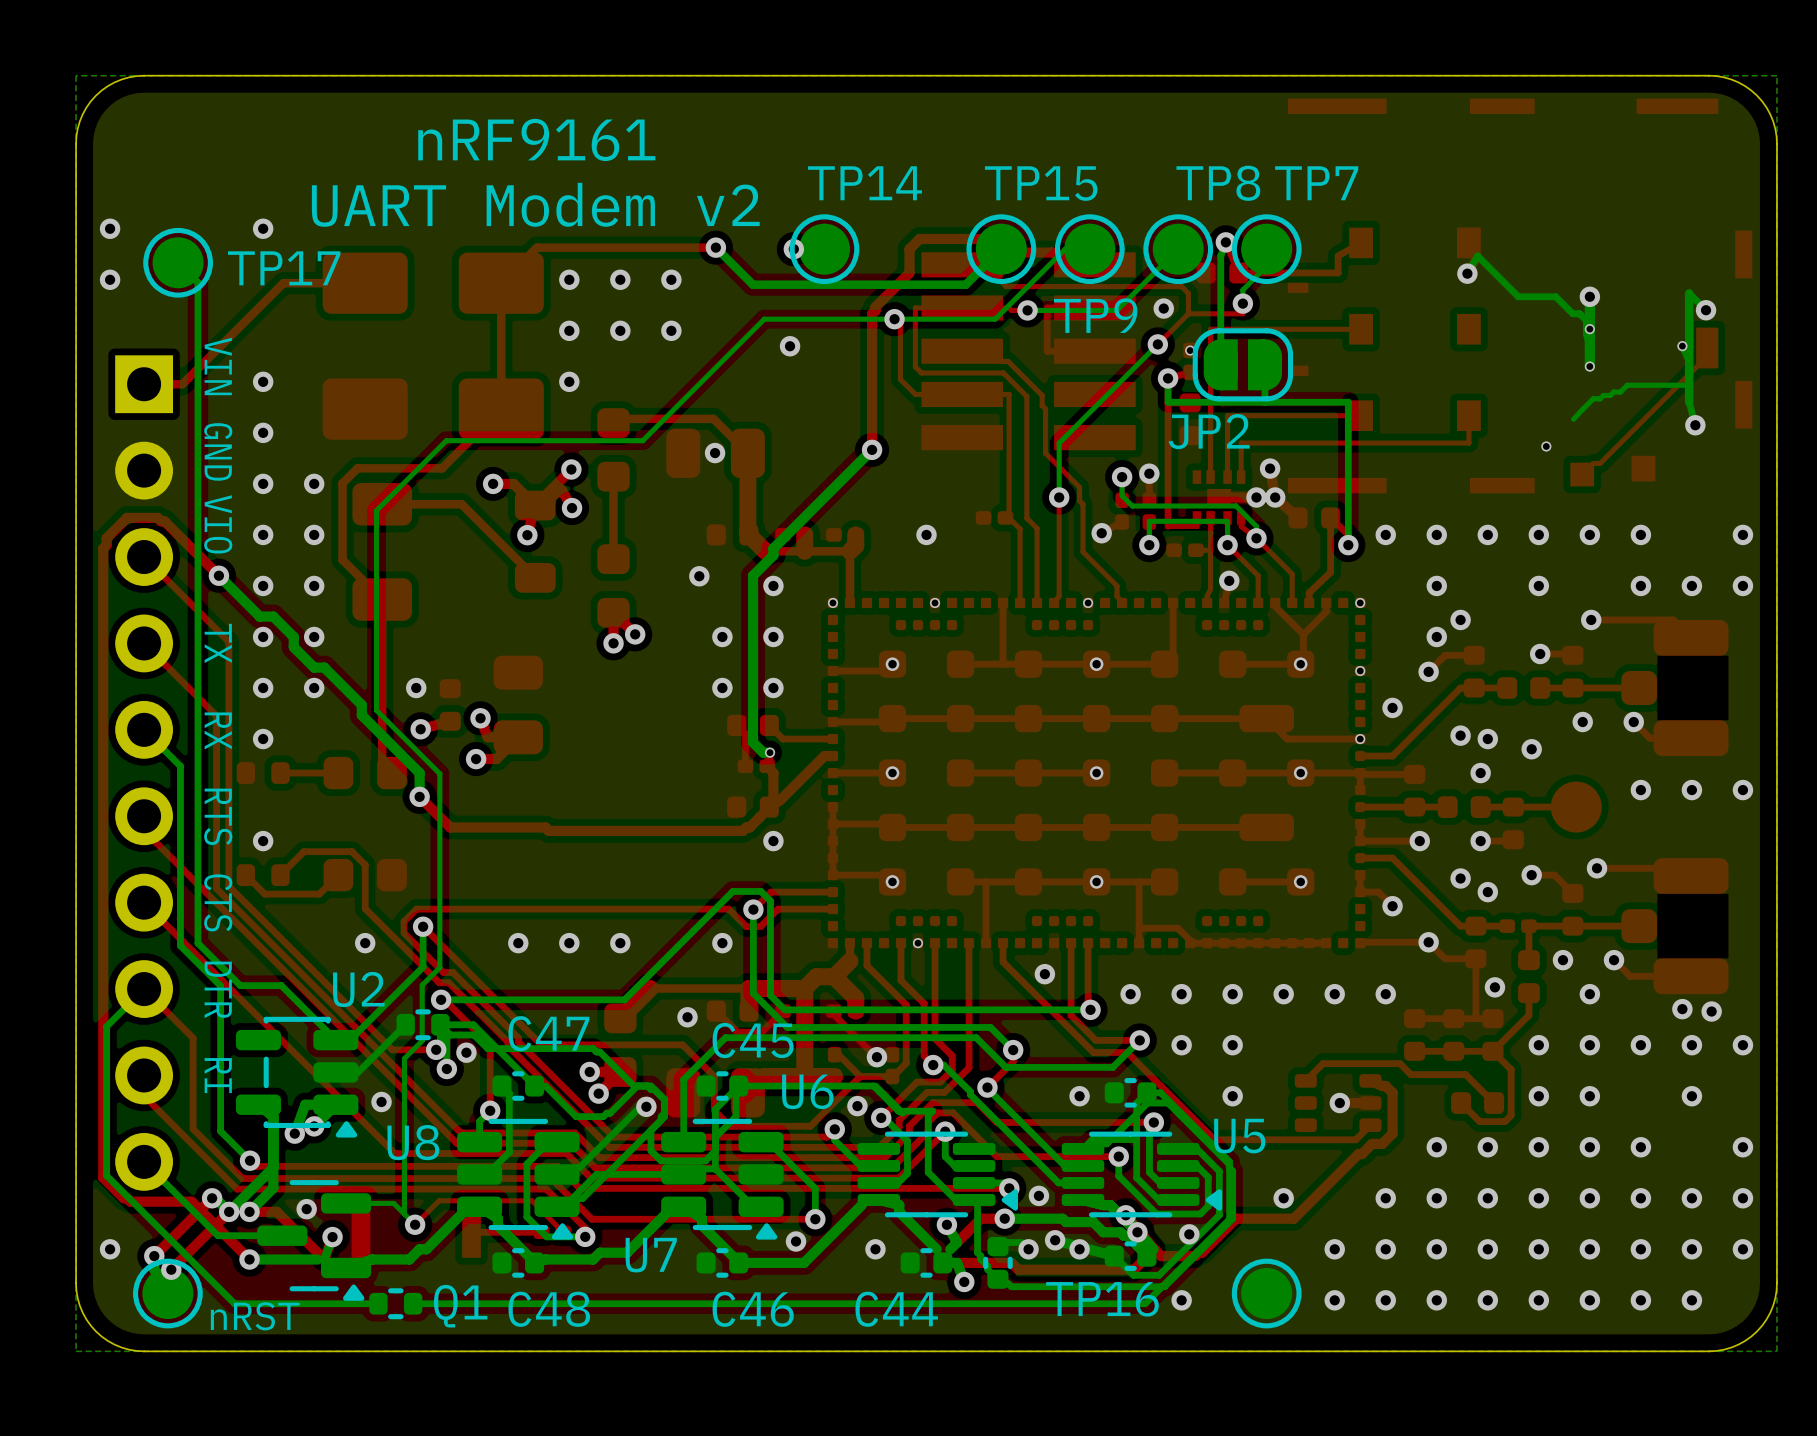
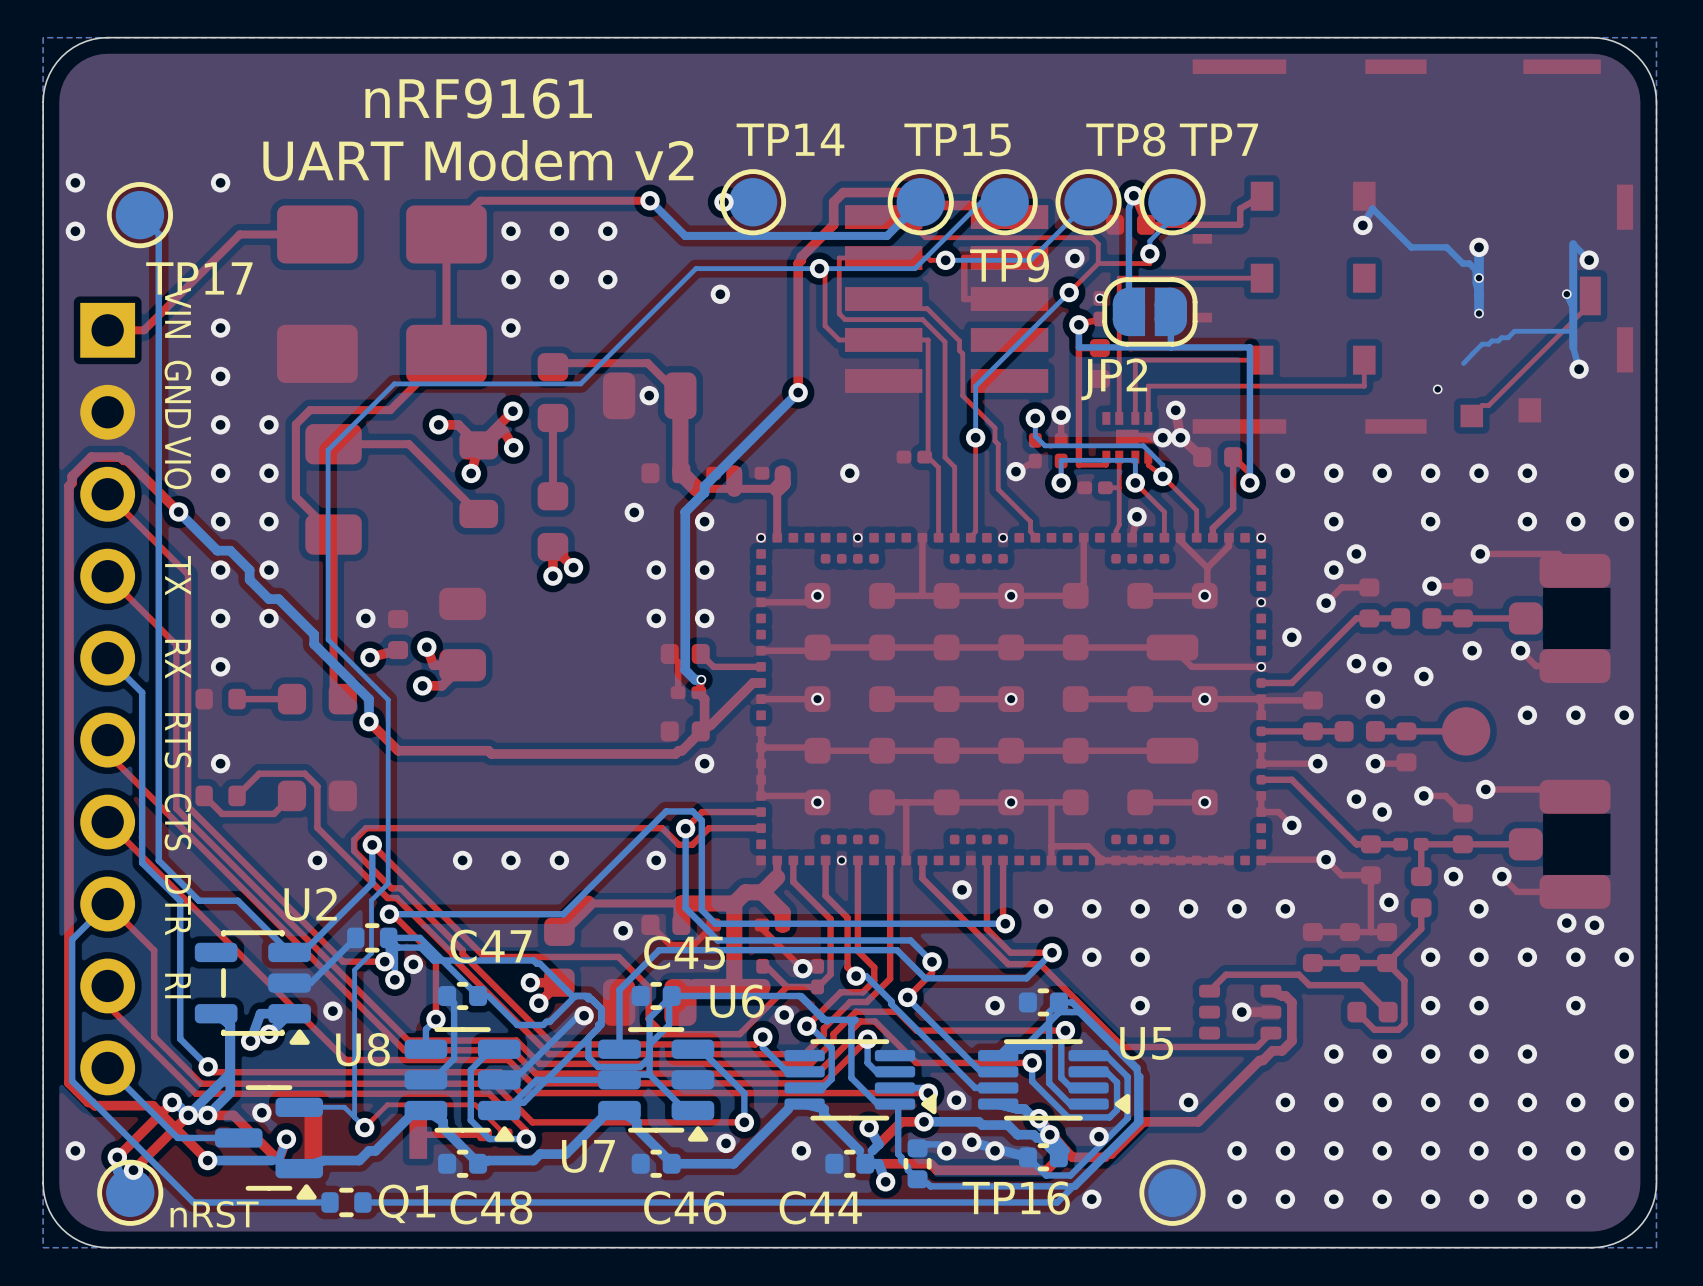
TP17 name position: TP17 (284, 268) -> TP17 (199, 278)

